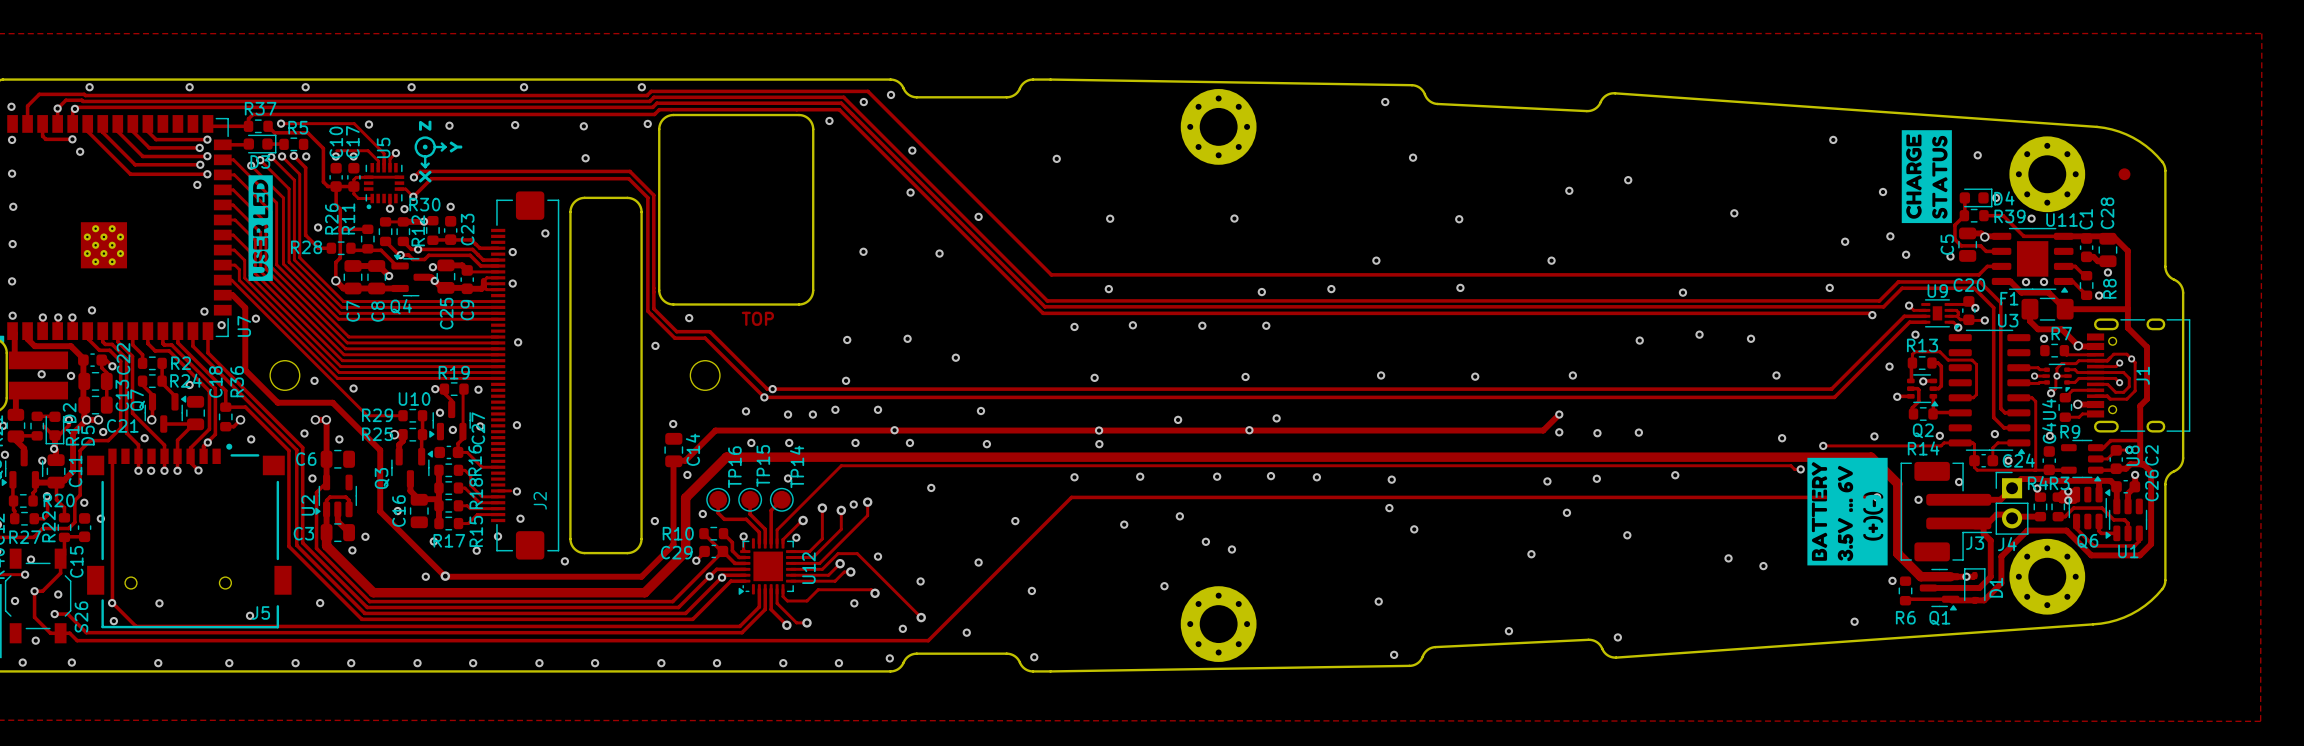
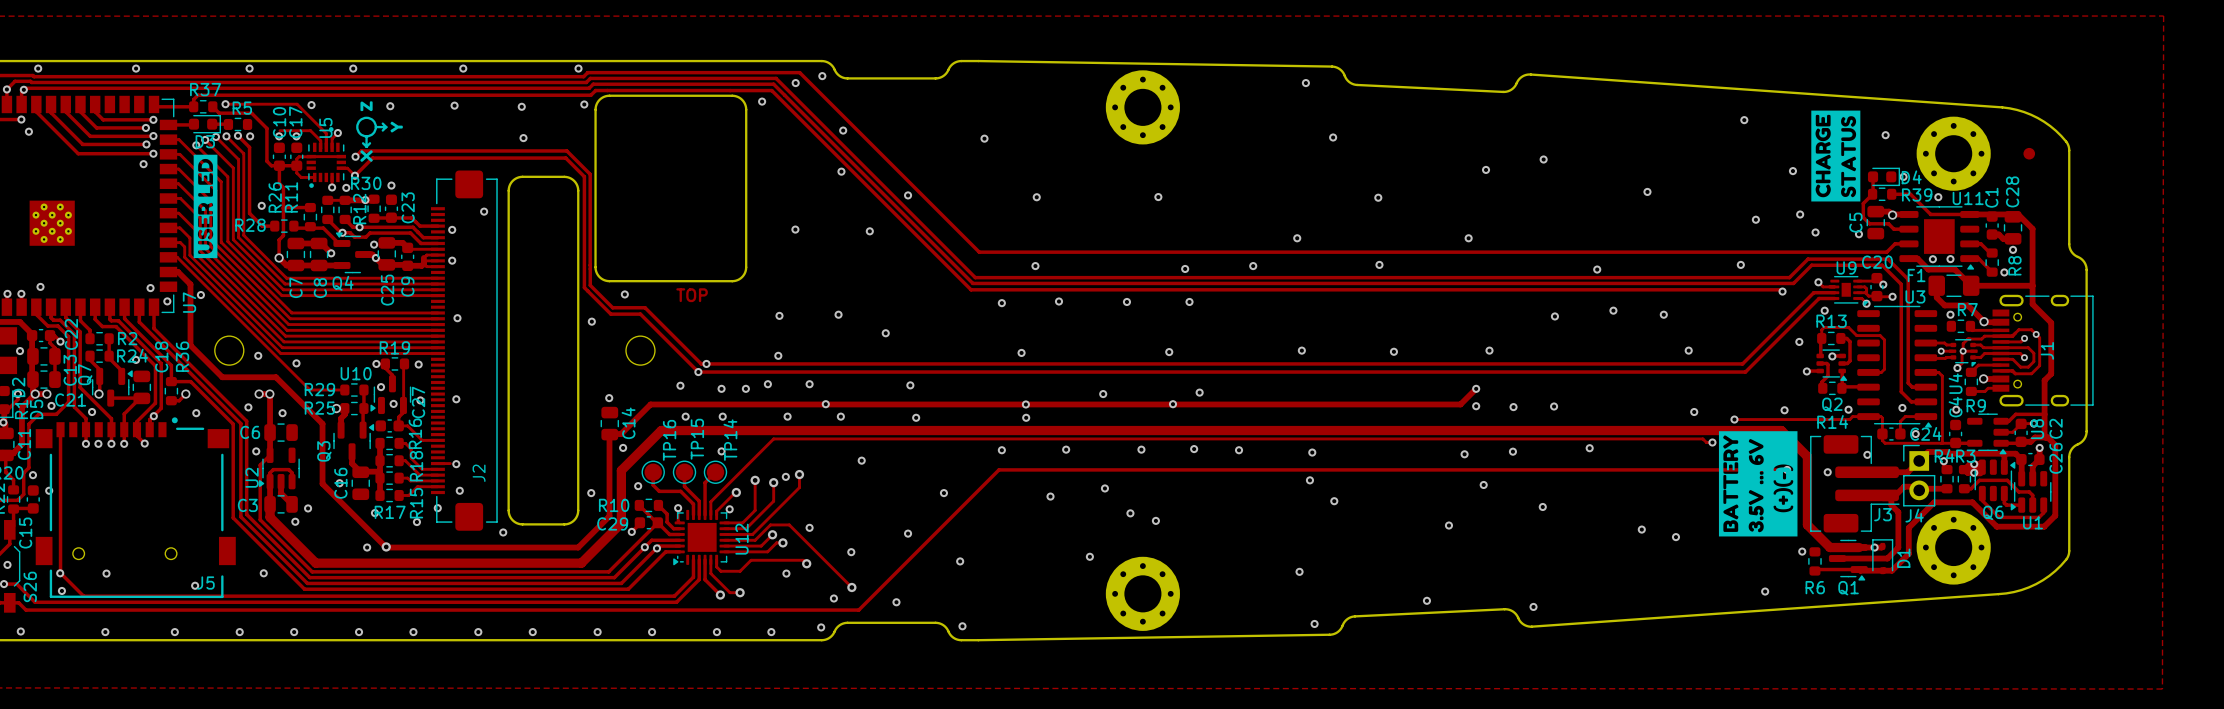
drawing position: (425, 147) -> (331, 129)

